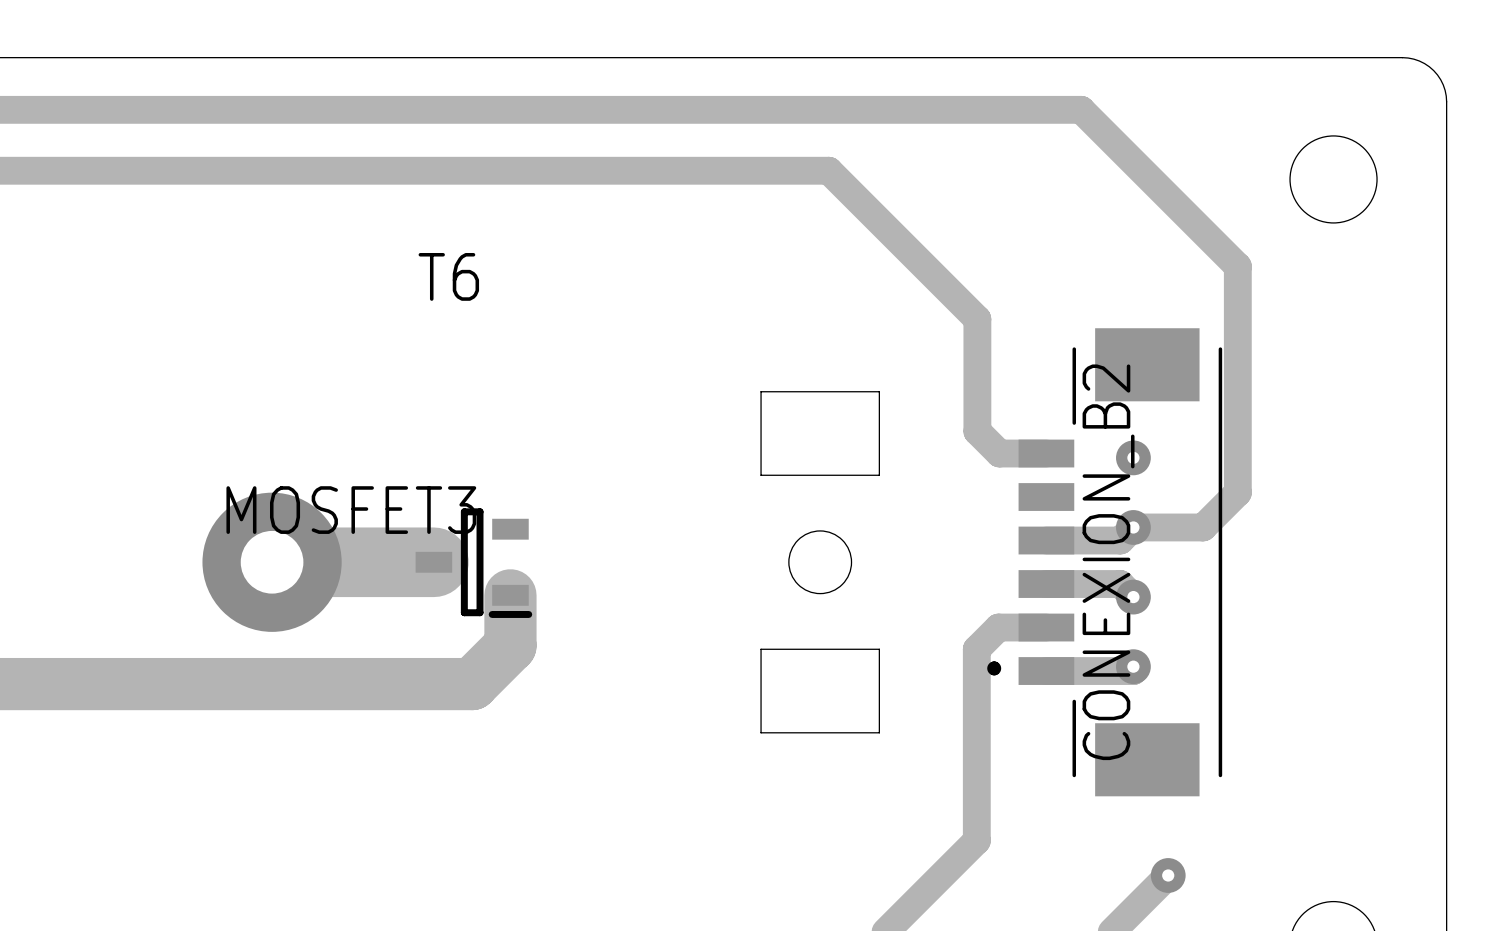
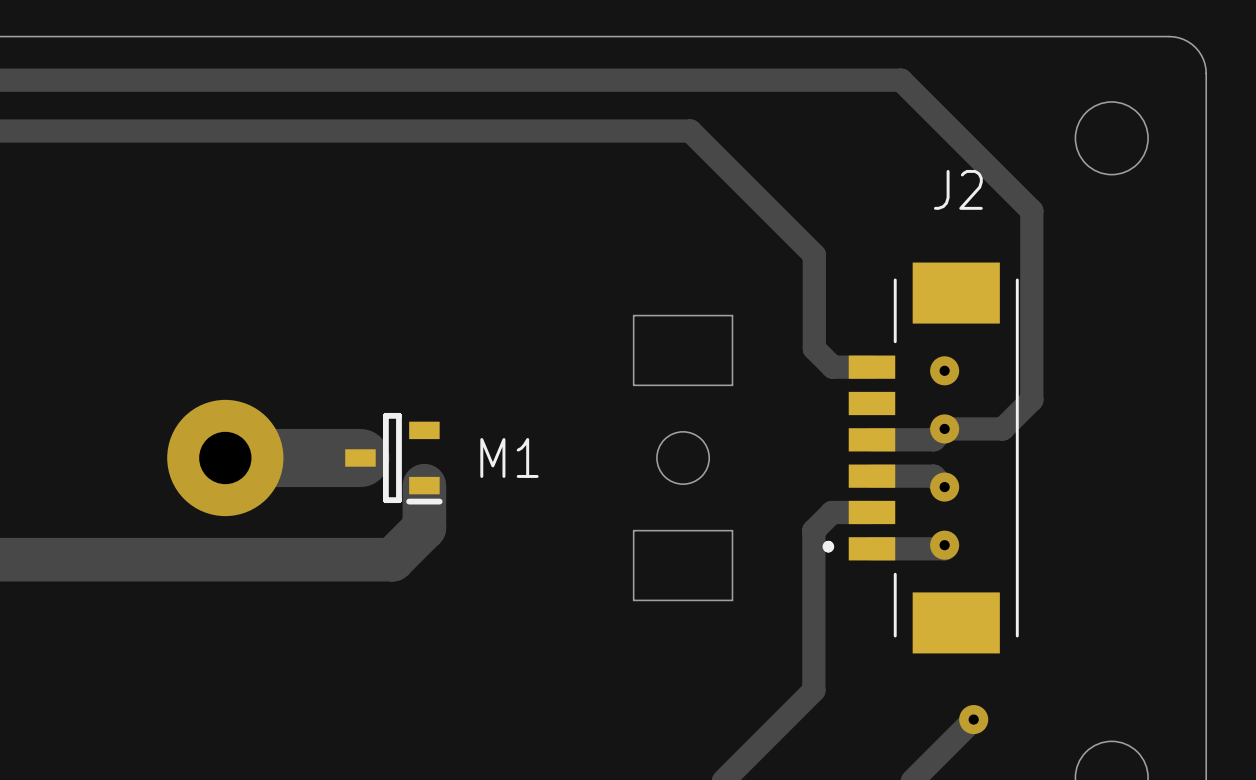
T6: (448, 276) -> none
MOSFET3 name: MOSFET3 (351, 510) -> M1 (509, 457)
CONEXION_B2 name: CONEXION_B2 (1108, 562) -> J2 (958, 189)

